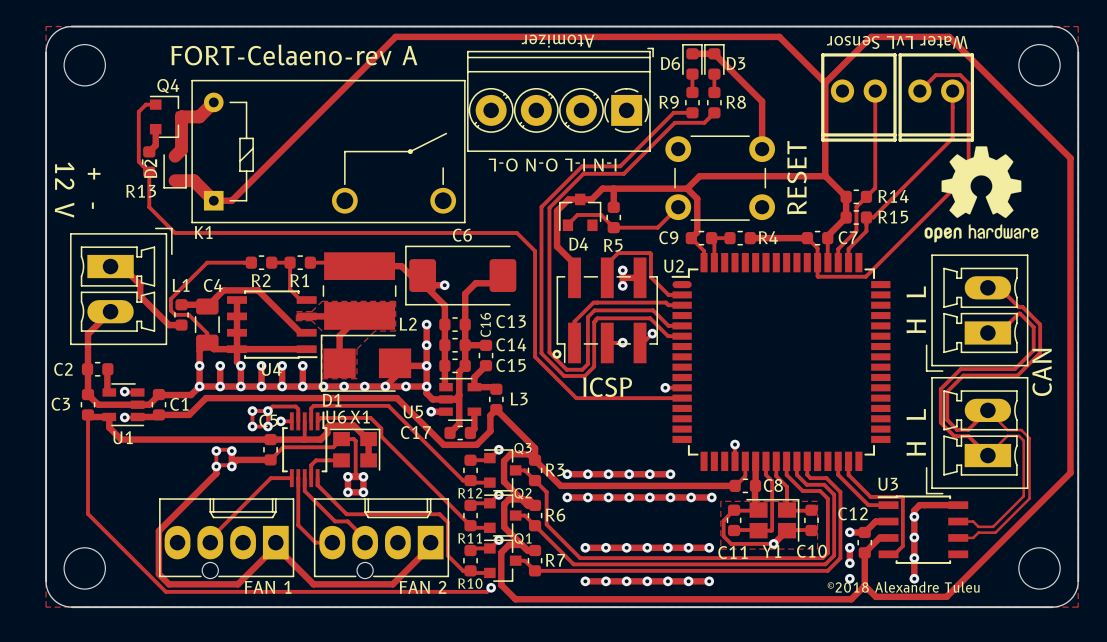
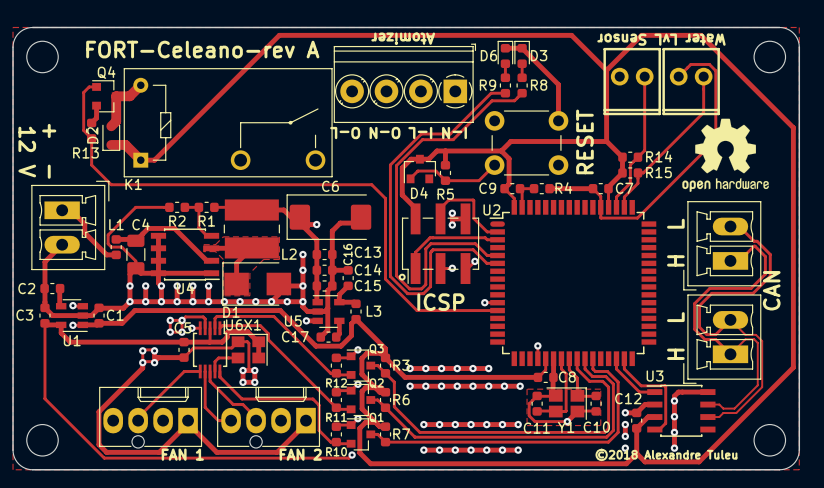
text: FORT-Celaeno-rev A (294, 54) -> FORT-Celeano-rev A (202, 49)

